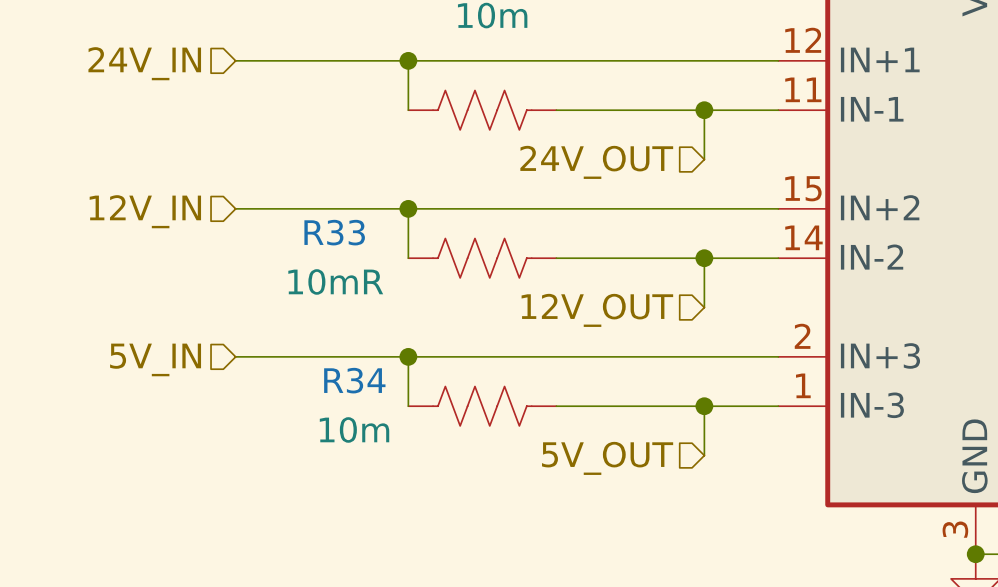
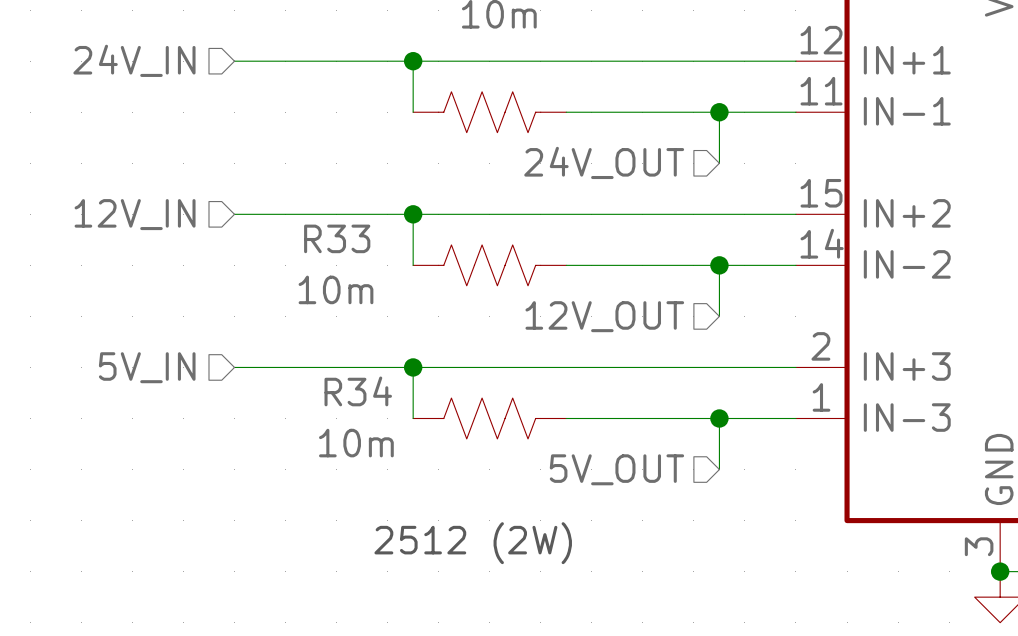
R33 value: 10mR (335, 281) -> 10m (335, 289)
text: none -> 2512 (2W) (473, 543)

